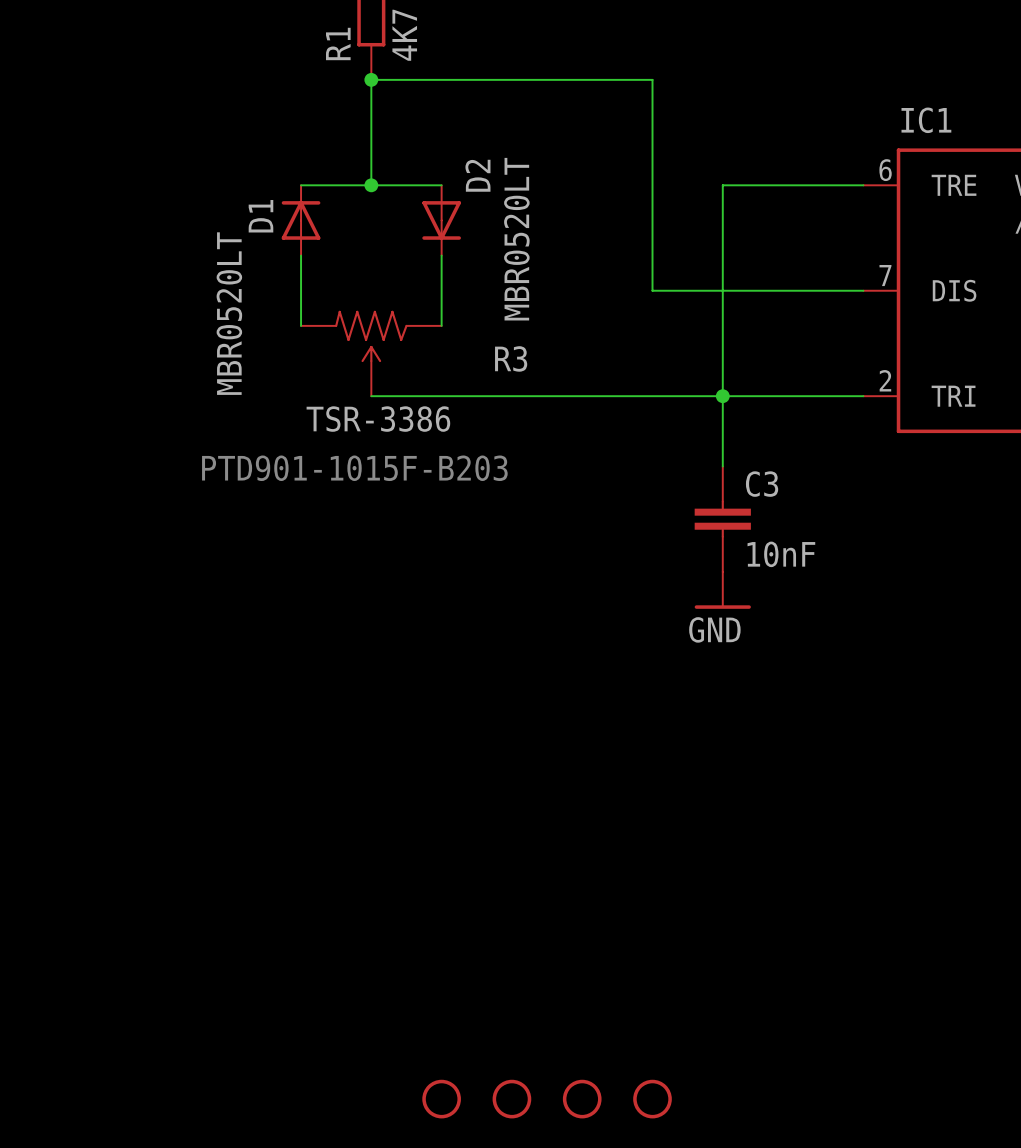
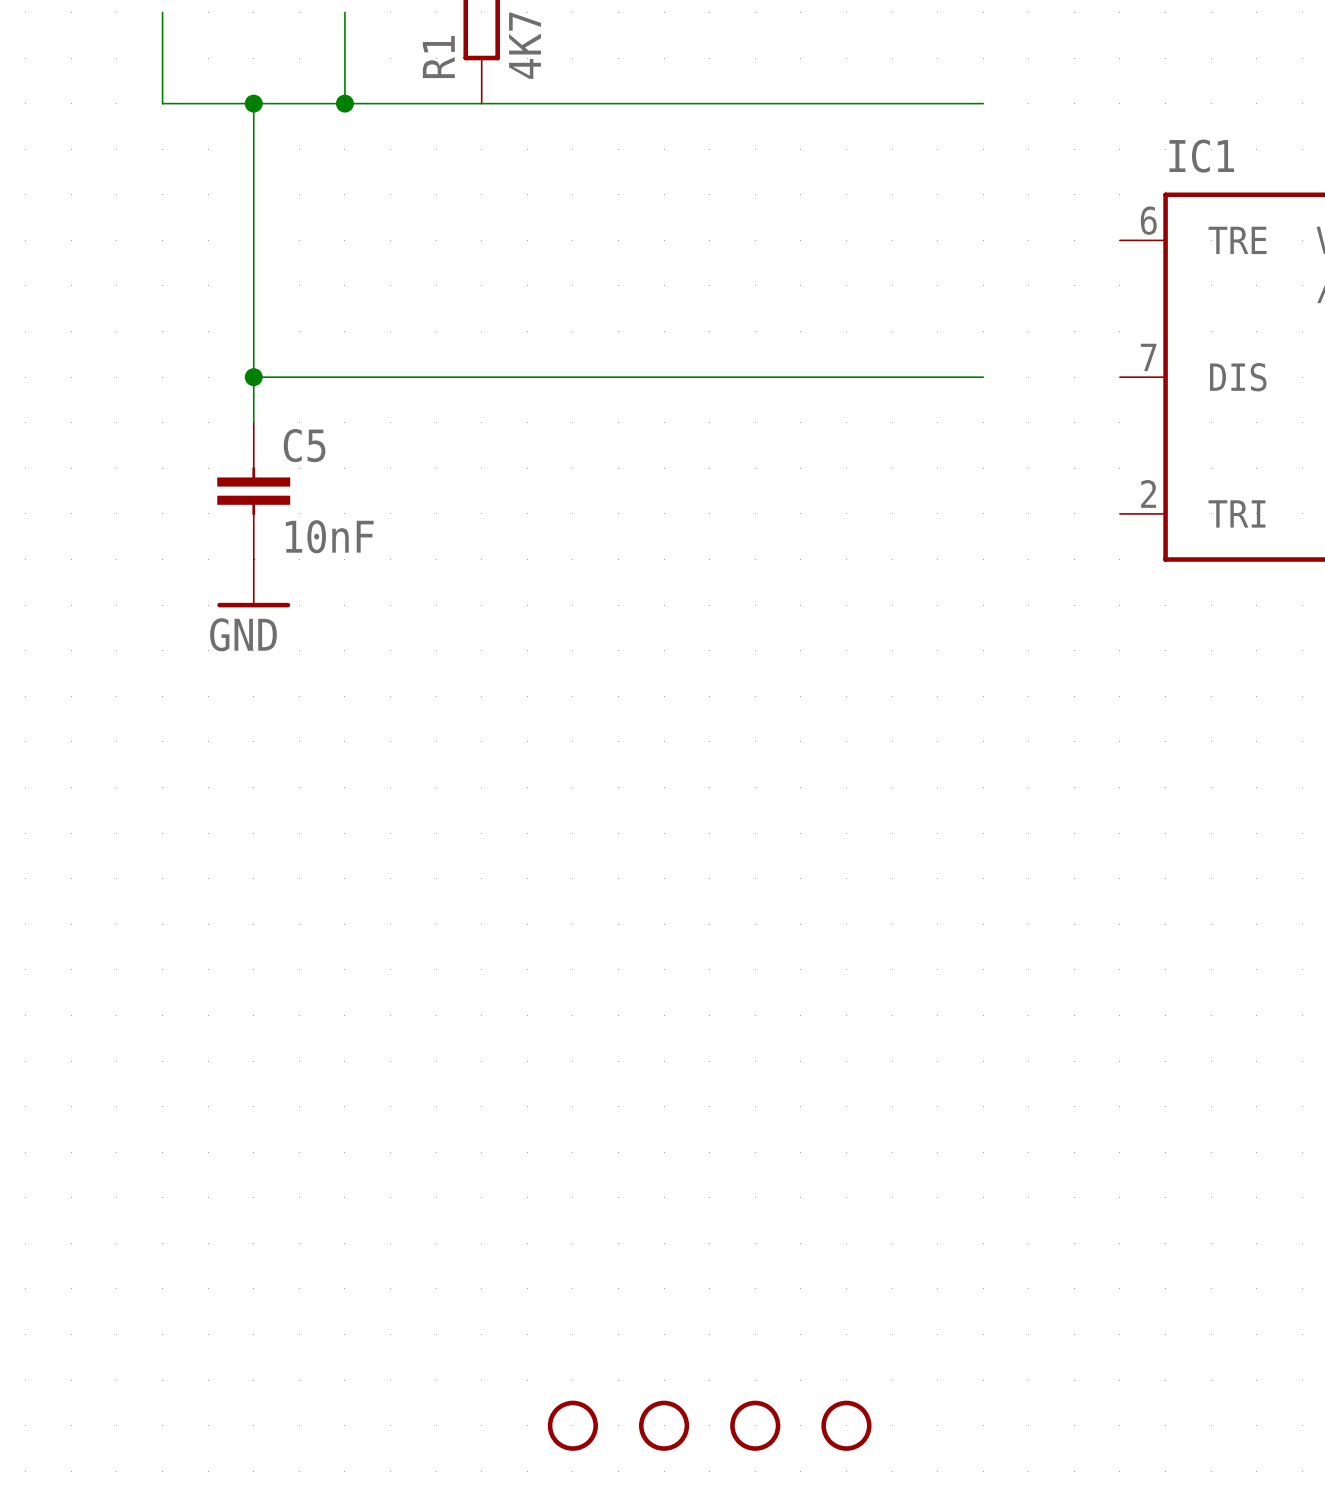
wire: none -> (253, 103) (253, 422)
junction: none -> (253, 103)
junction: none -> (344, 103)
wire: (371, 79) (371, 185) -> (481, 103) (162, 103) (162, 12)
junction: (371, 79) -> none
wire: (652, 79) (652, 290) -> (846, 103) (983, 103)
wire: (301, 185) (441, 185) -> none
junction: (371, 185) -> none
wire: (863, 185) (722, 185) (722, 466) -> none
D1: MBR0520LT (301, 220) -> none
D2: MBR0520LT (441, 220) -> none
wire: (301, 255) (301, 325) -> (344, 12) (344, 103)
wire: (441, 255) (441, 325) -> none
wire: none -> (253, 377) (846, 377)
junction: none -> (253, 377)
wire: (757, 290) (863, 290) -> none
R3: TSR-3386 (371, 353) -> none
C5: none -> 10nF (253, 491)
wire: (371, 396) (863, 396) -> none
junction: (722, 396) -> none
power symbol: none -> GND (253, 583)
text: PTD901-1015F-B203 (354, 468) -> none
C3: 10nF (722, 519) -> none
power symbol: GND (722, 590) -> none

